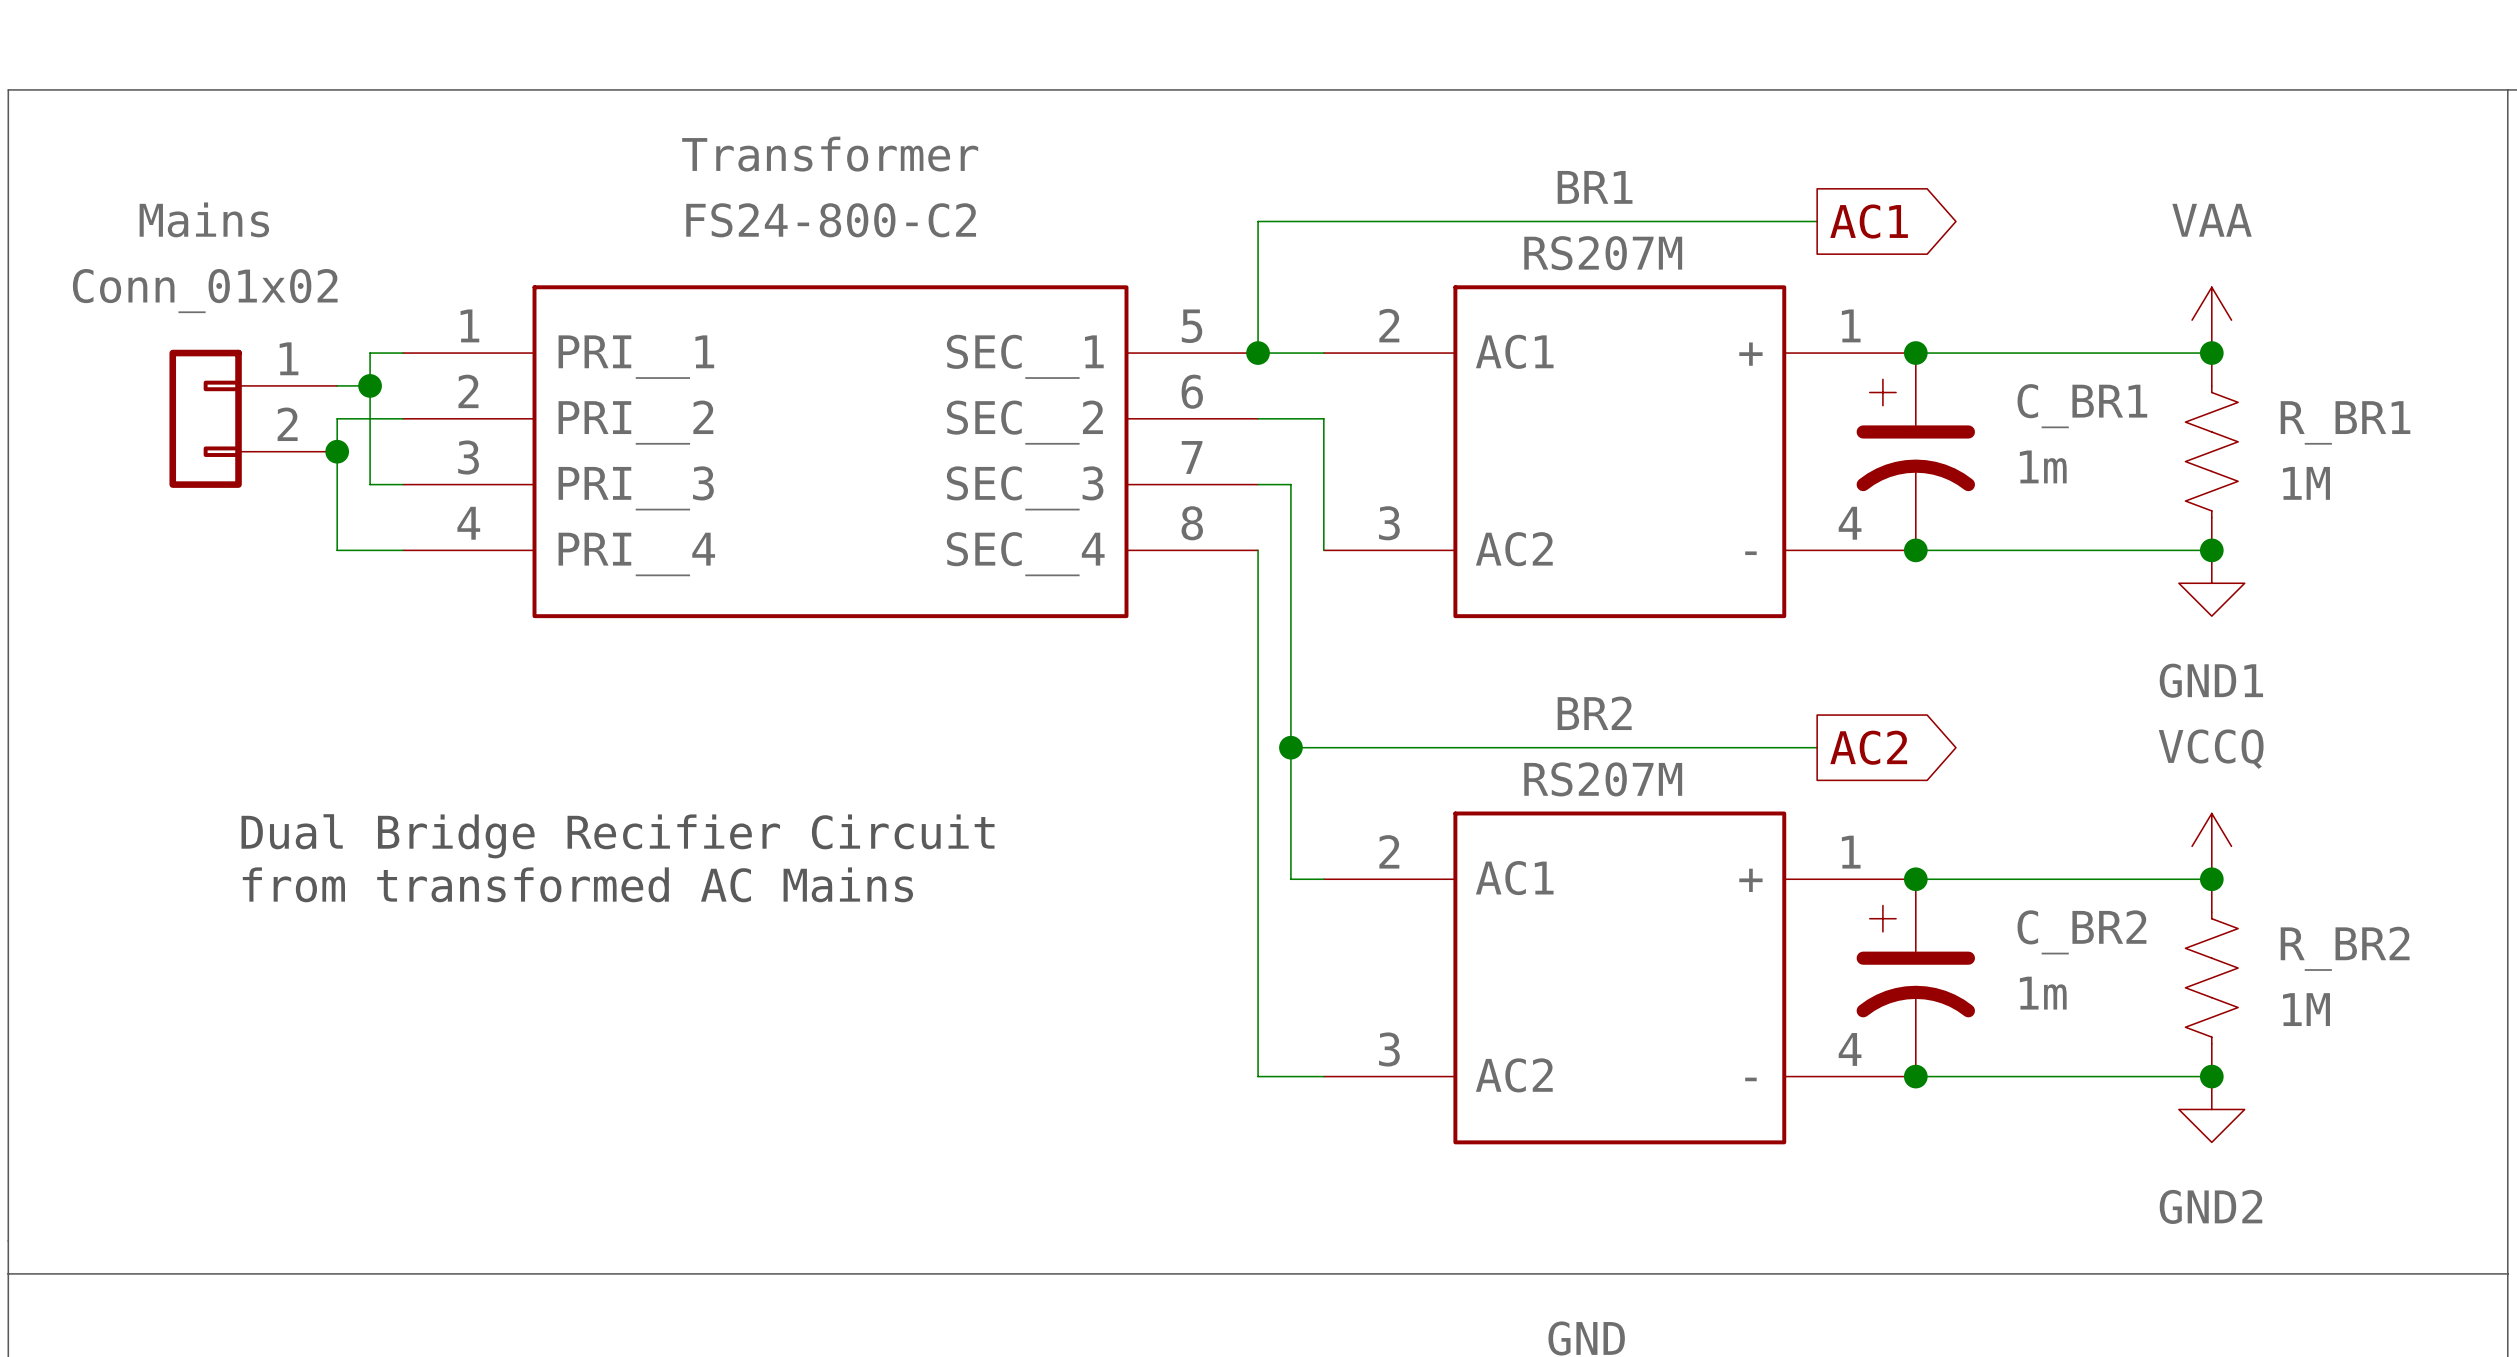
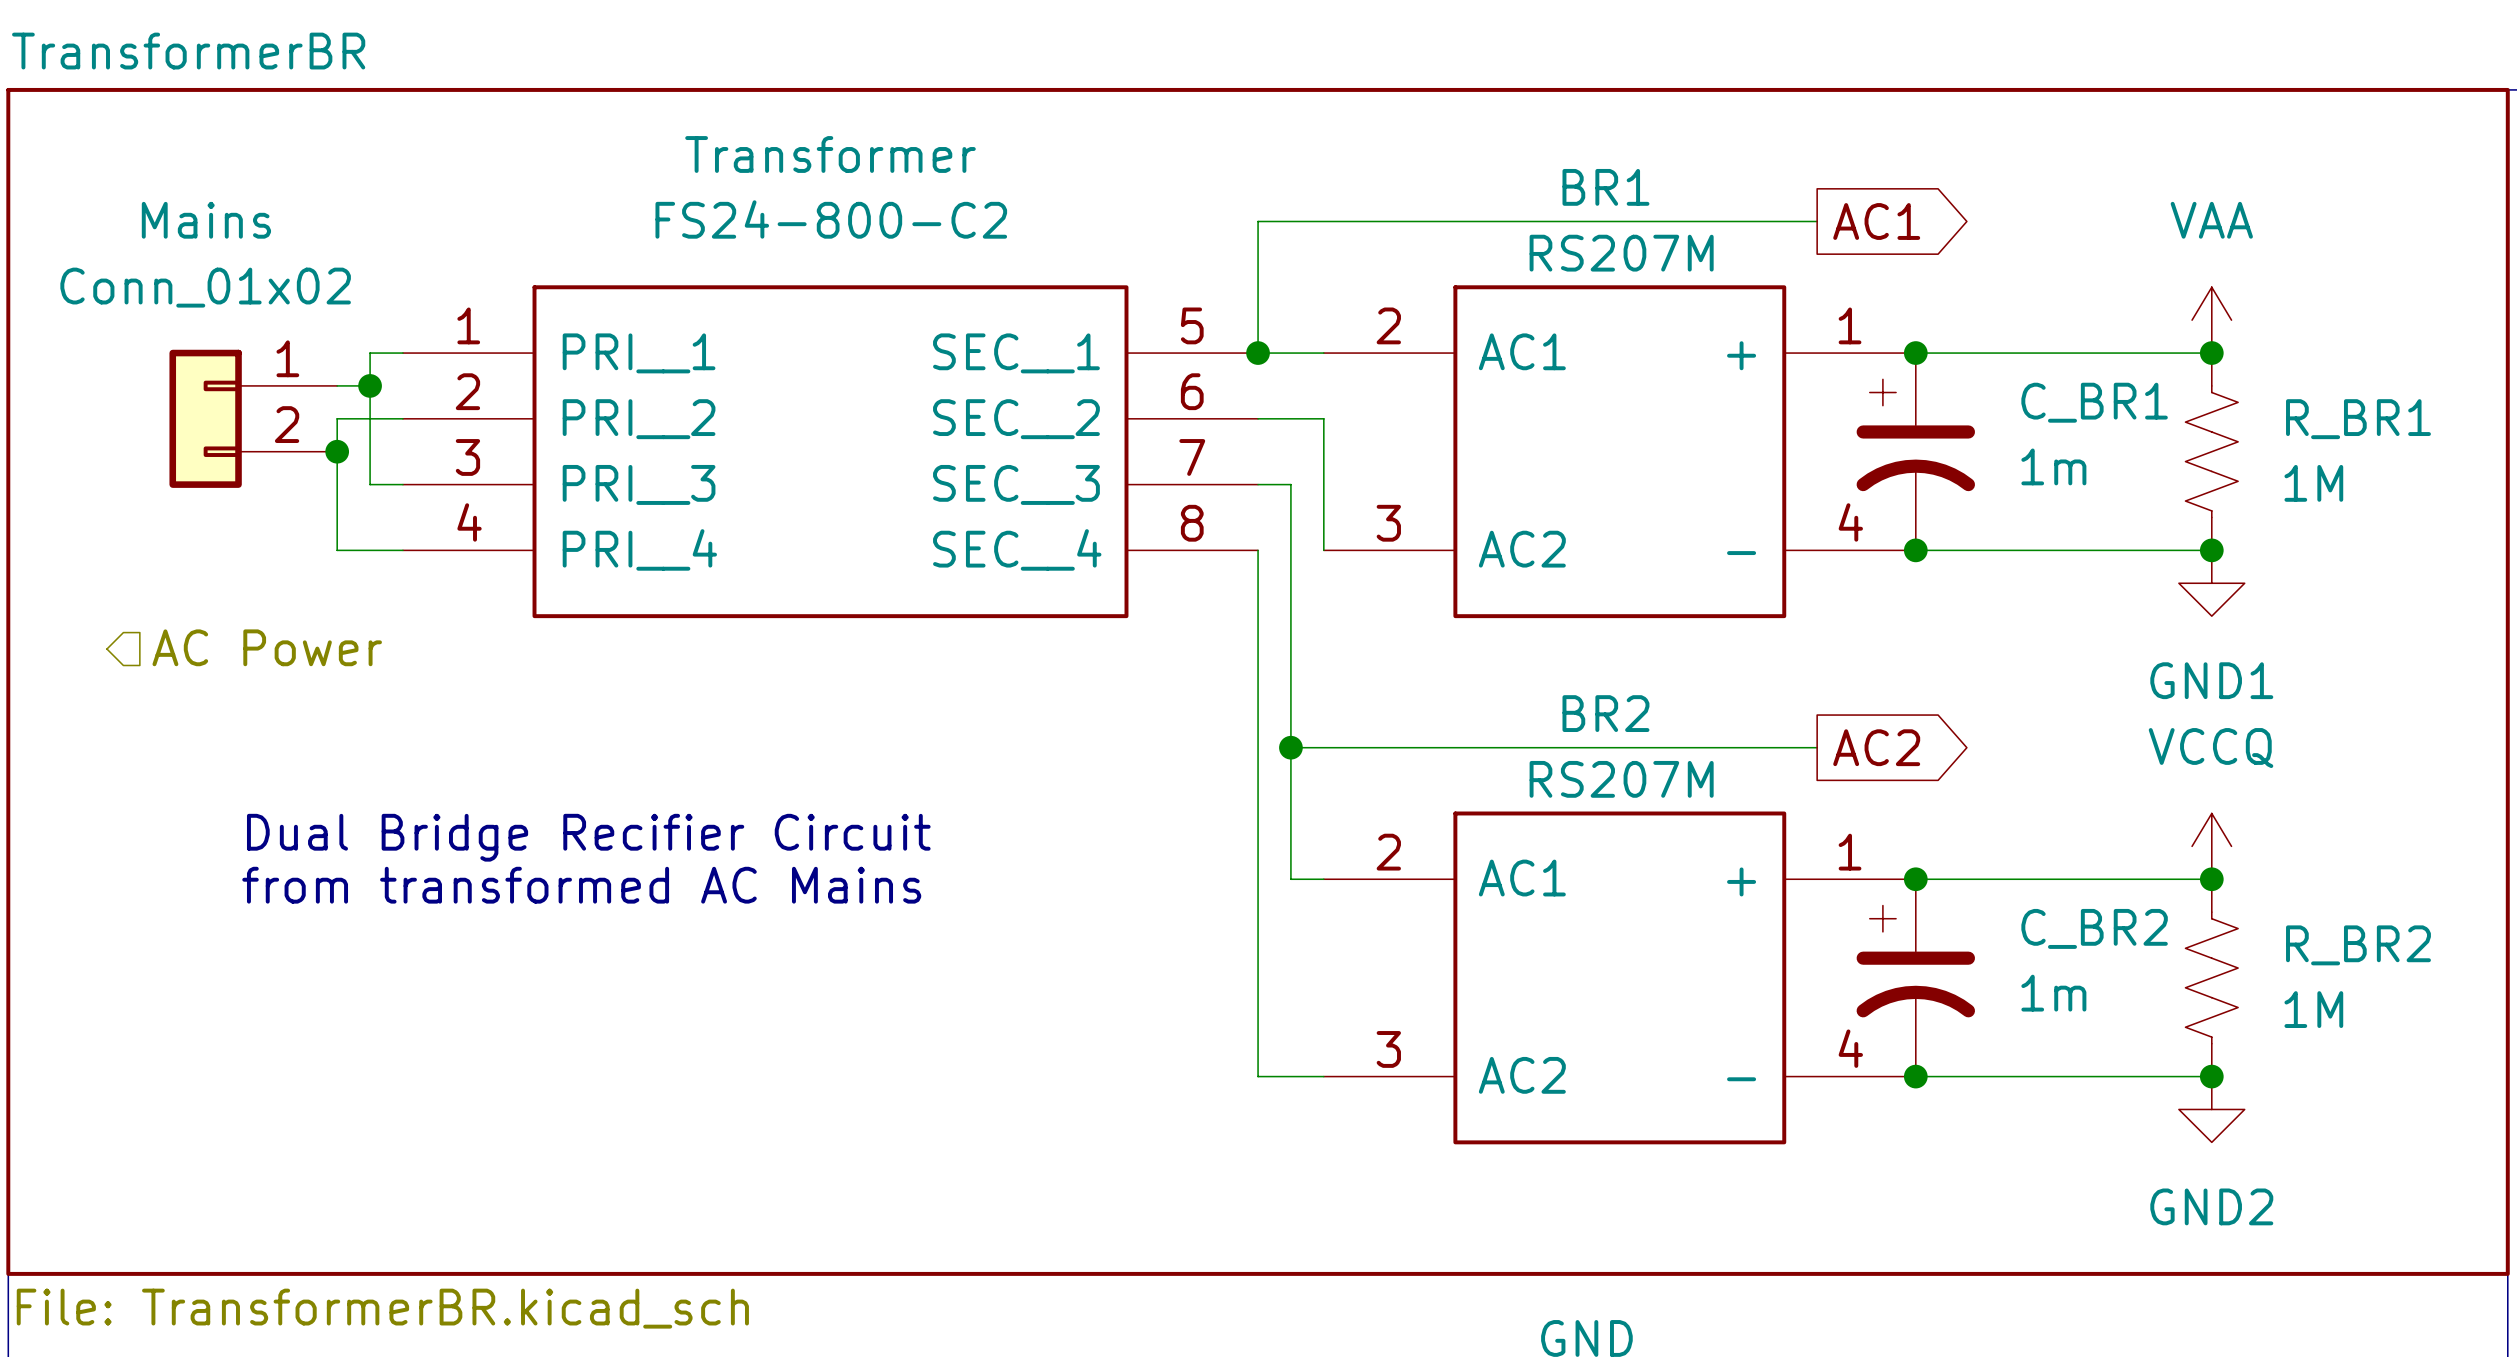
hierarchical label: none -> AC Power (267, 647)
sheet TransformerBR: none -> File: TransformerBR.kicad_sch (1258, 681)

